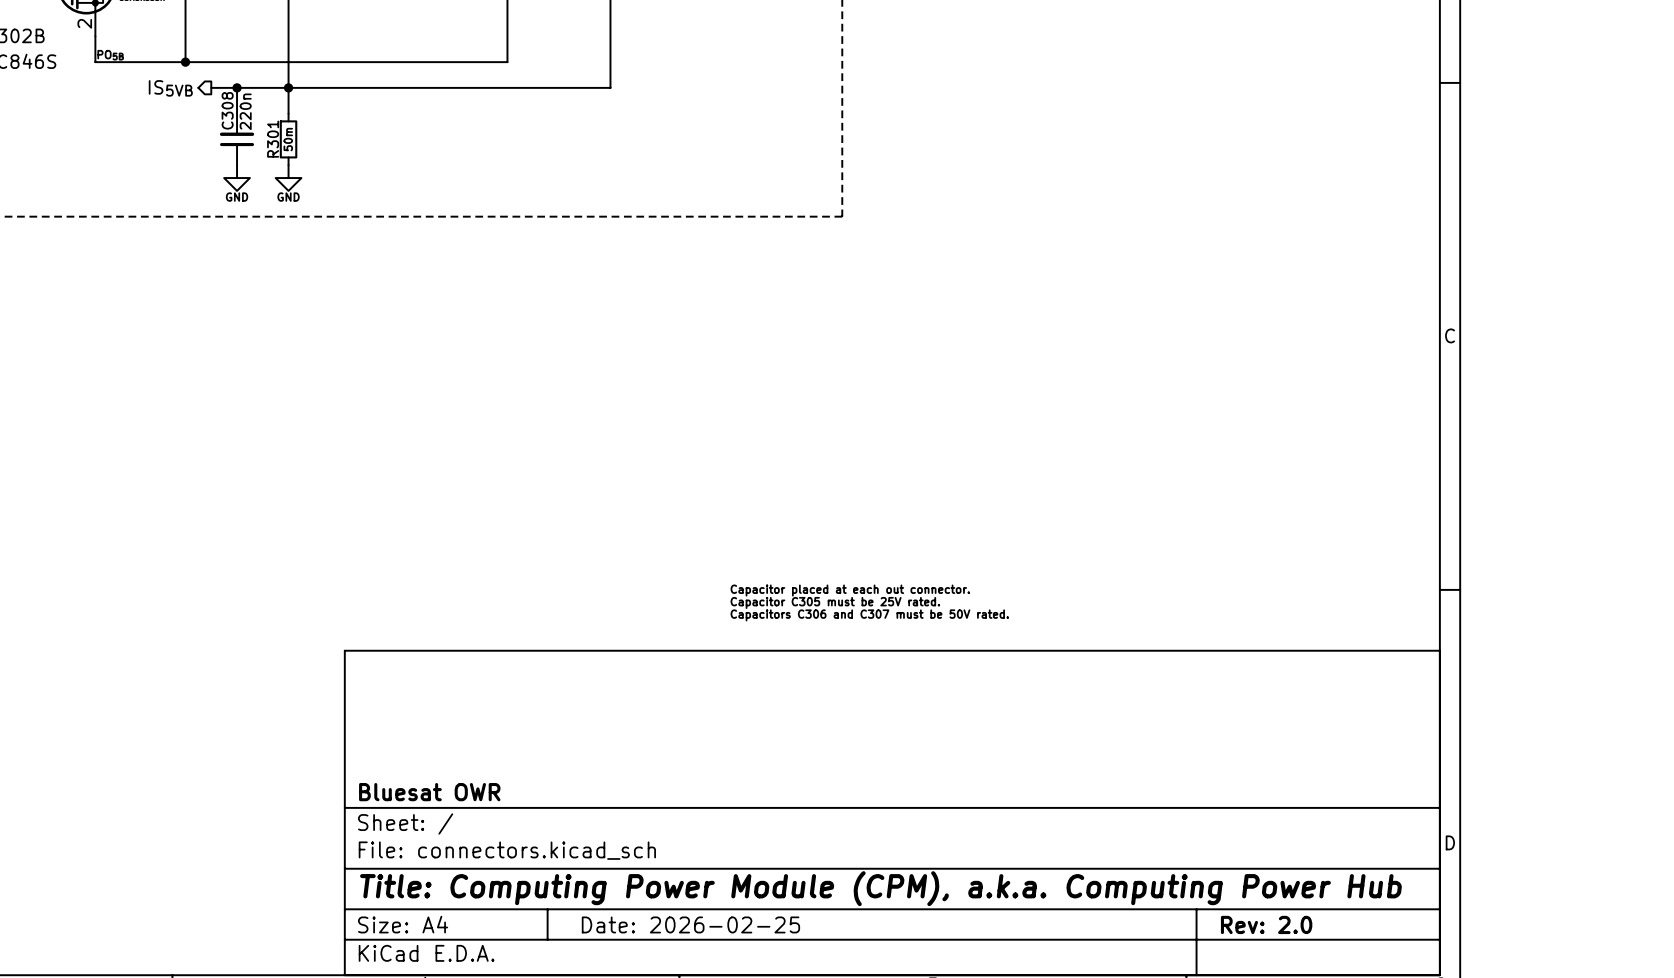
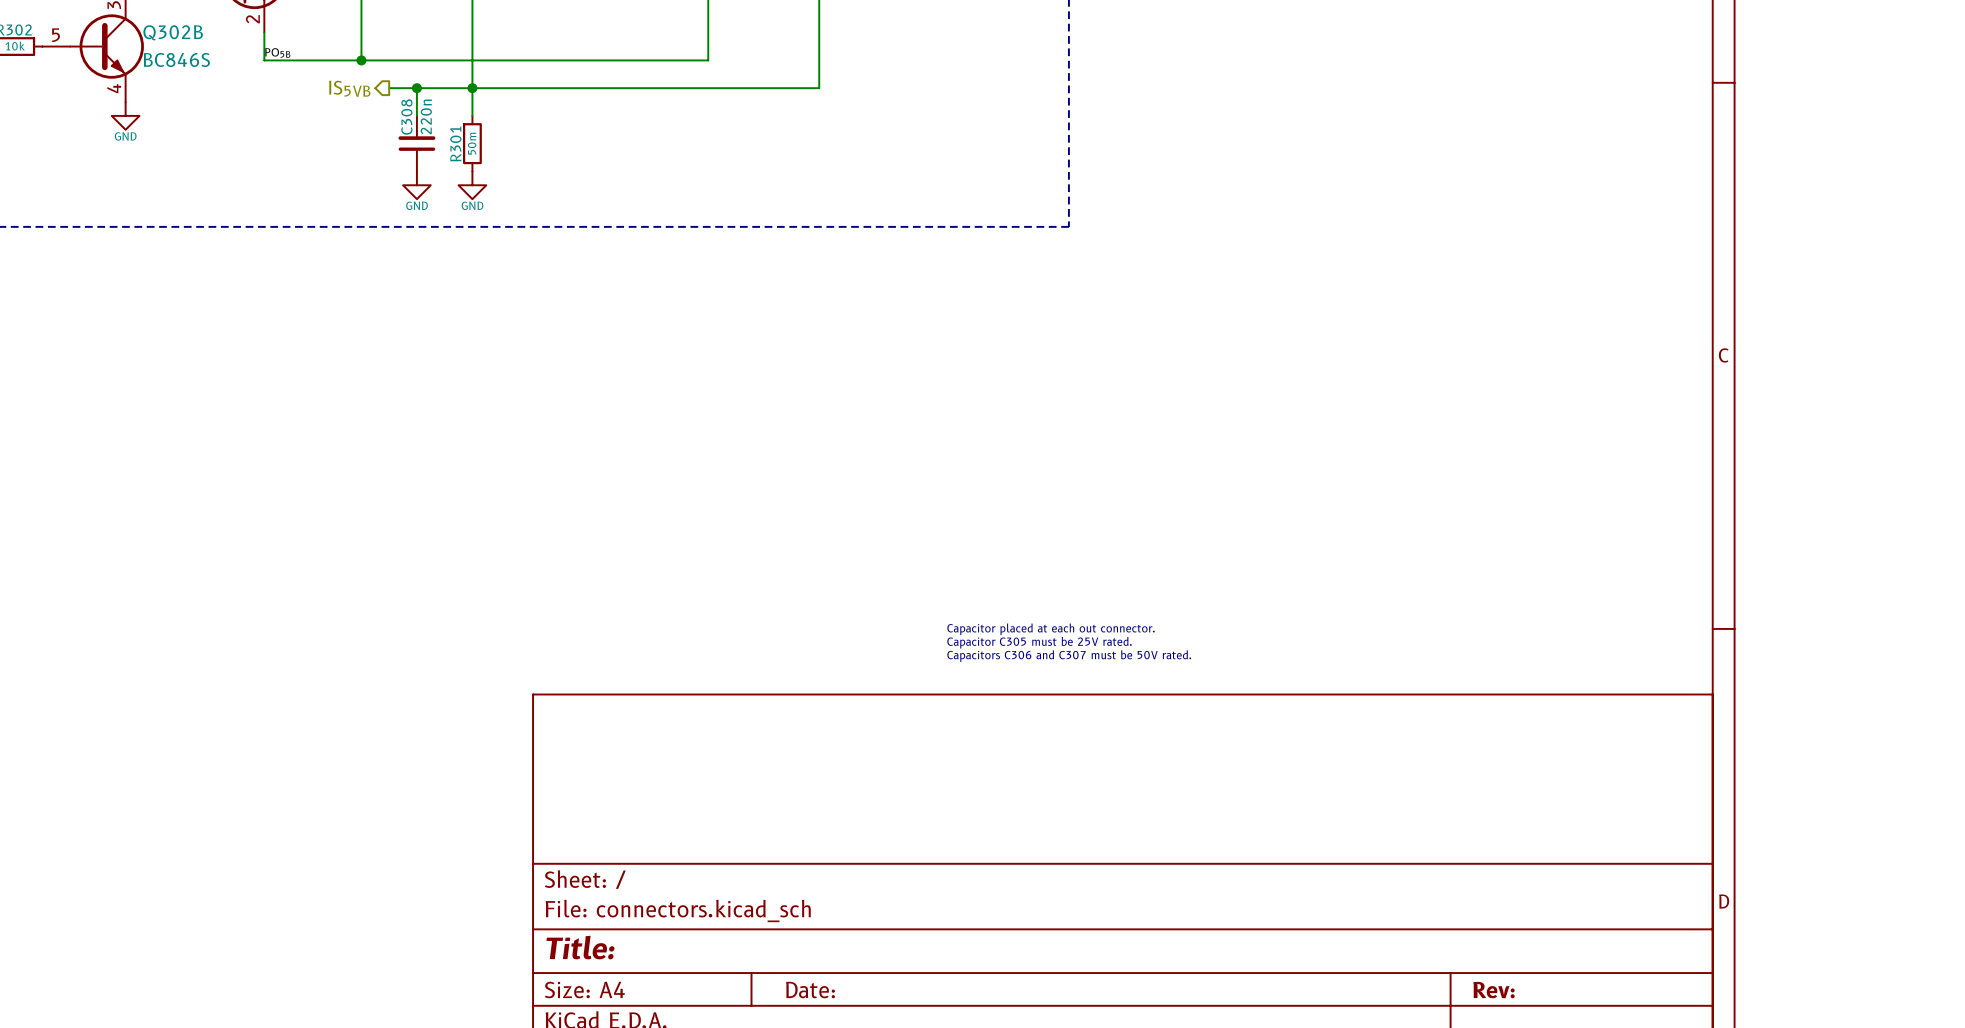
title block: Bluesat OWR (429, 792) -> none
title block: Title: Computing Power Module (CPM), a.k.a. Computing Power Hub (880, 888) -> Title: (580, 947)
title block: Date: 2026-02-25 (690, 924) -> Date: (810, 990)
title block: Rev: 2.0 (1266, 924) -> Rev: (1493, 990)

